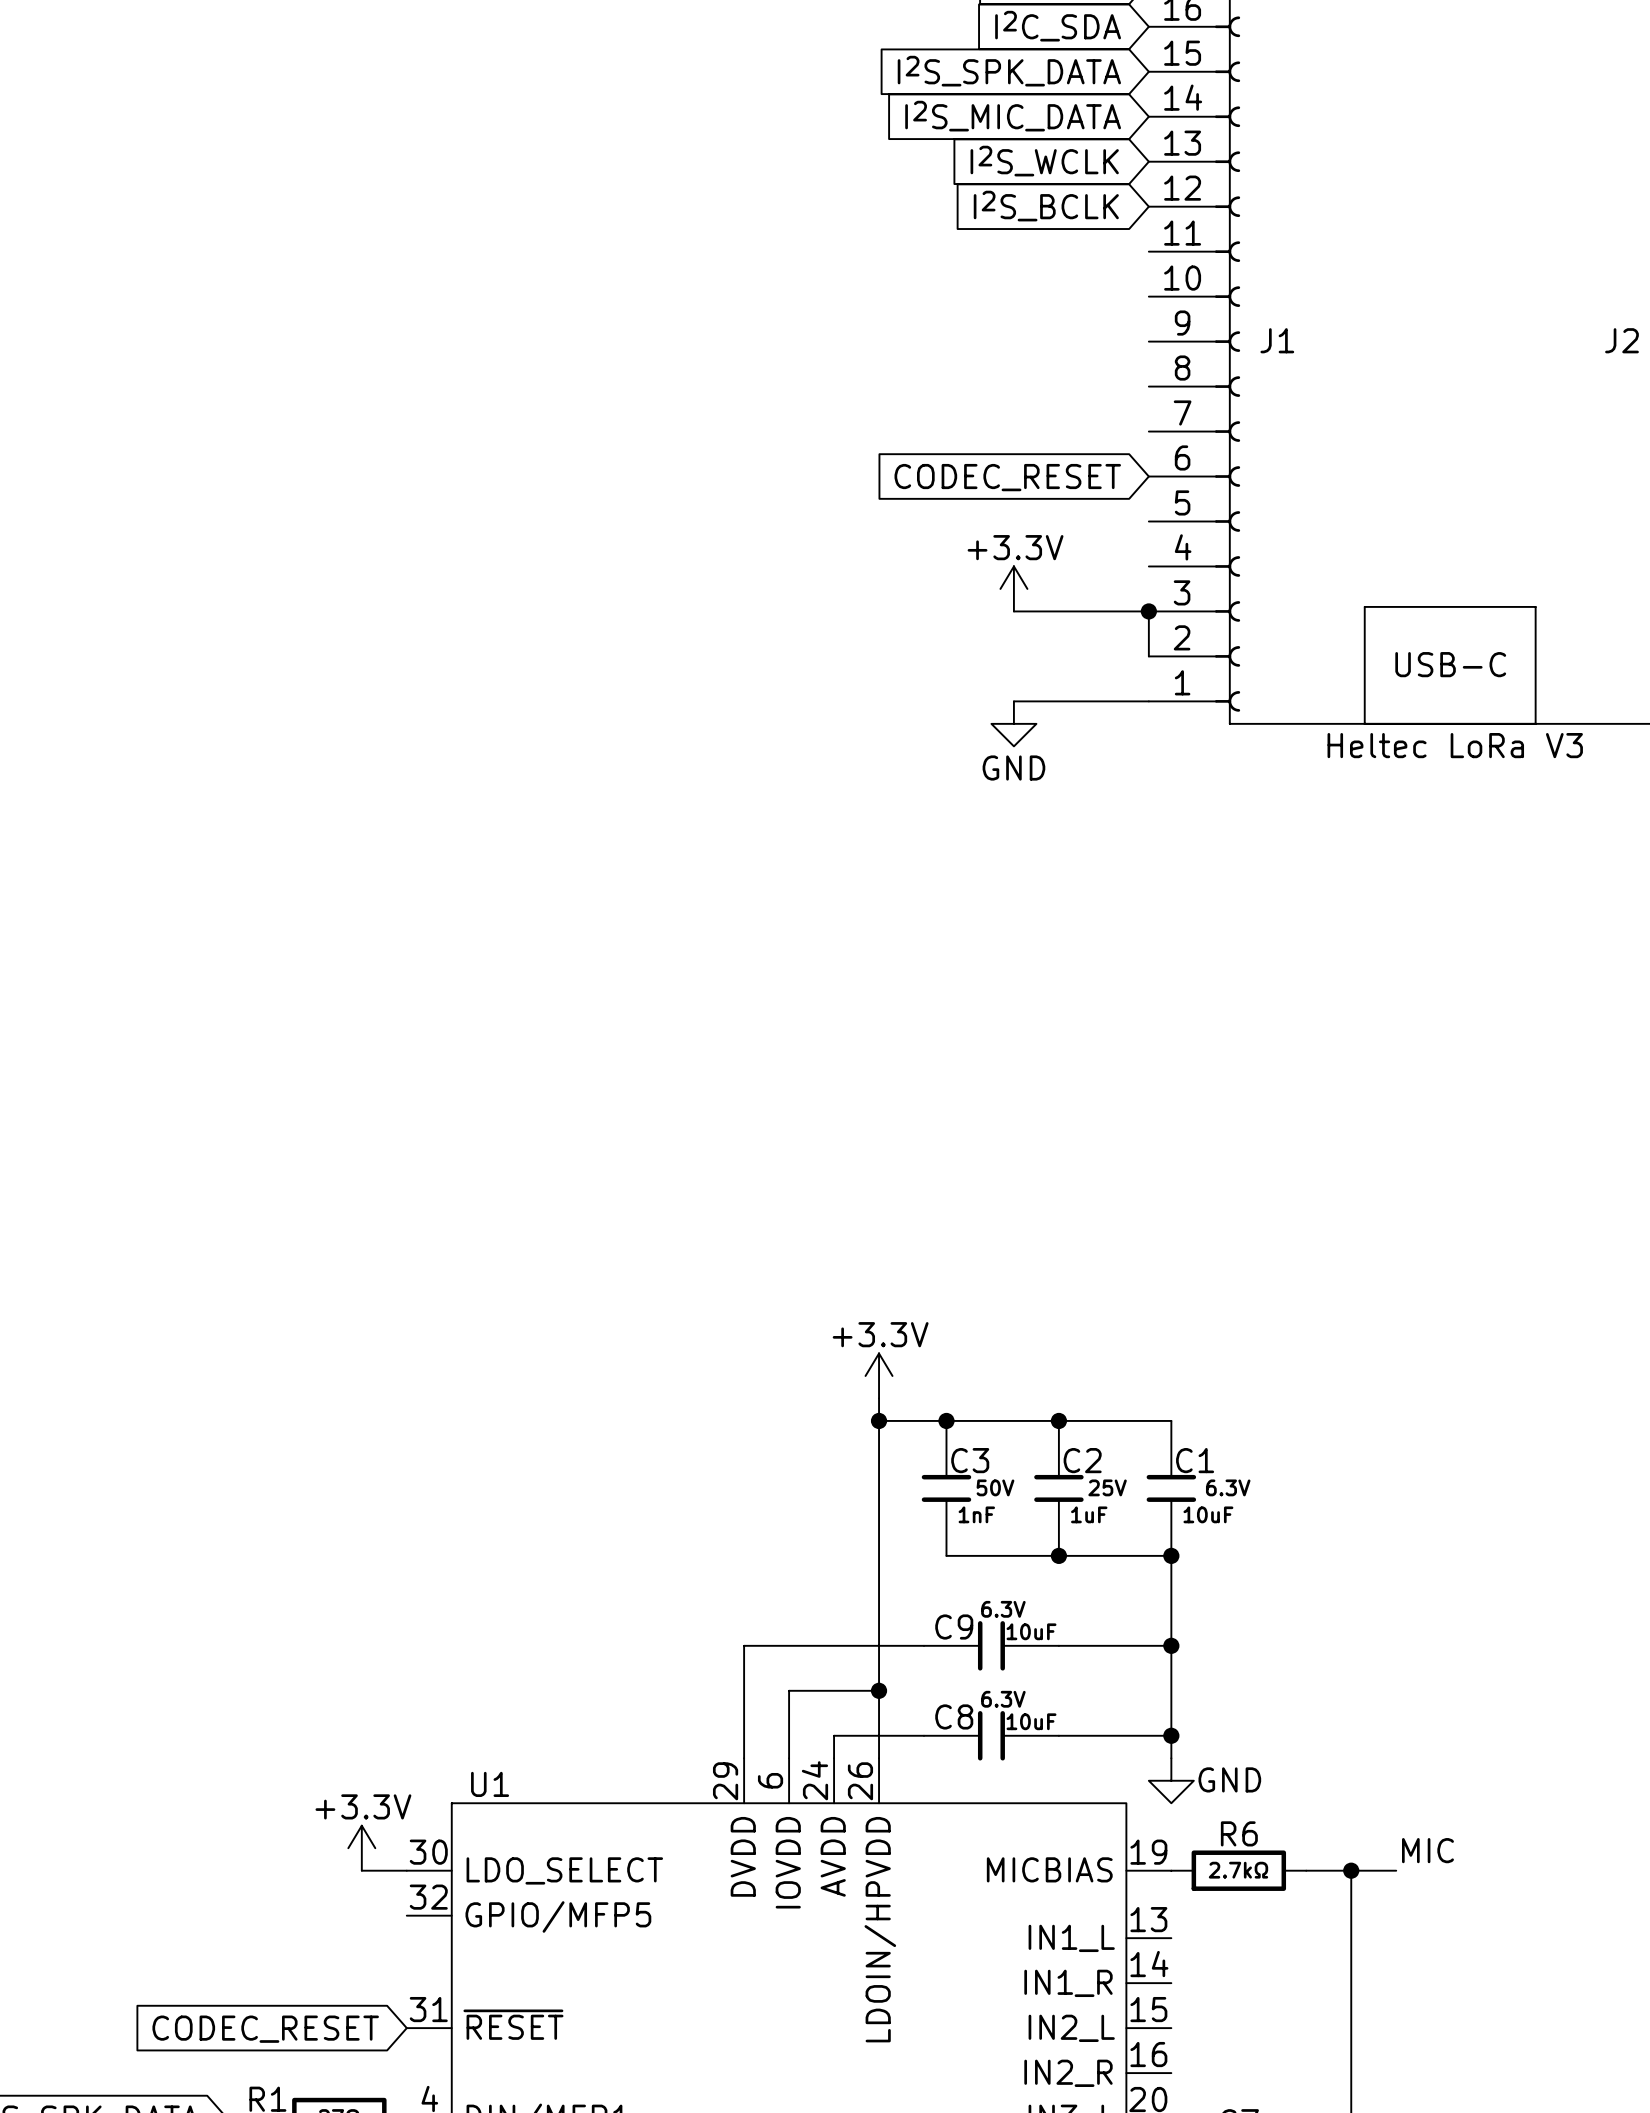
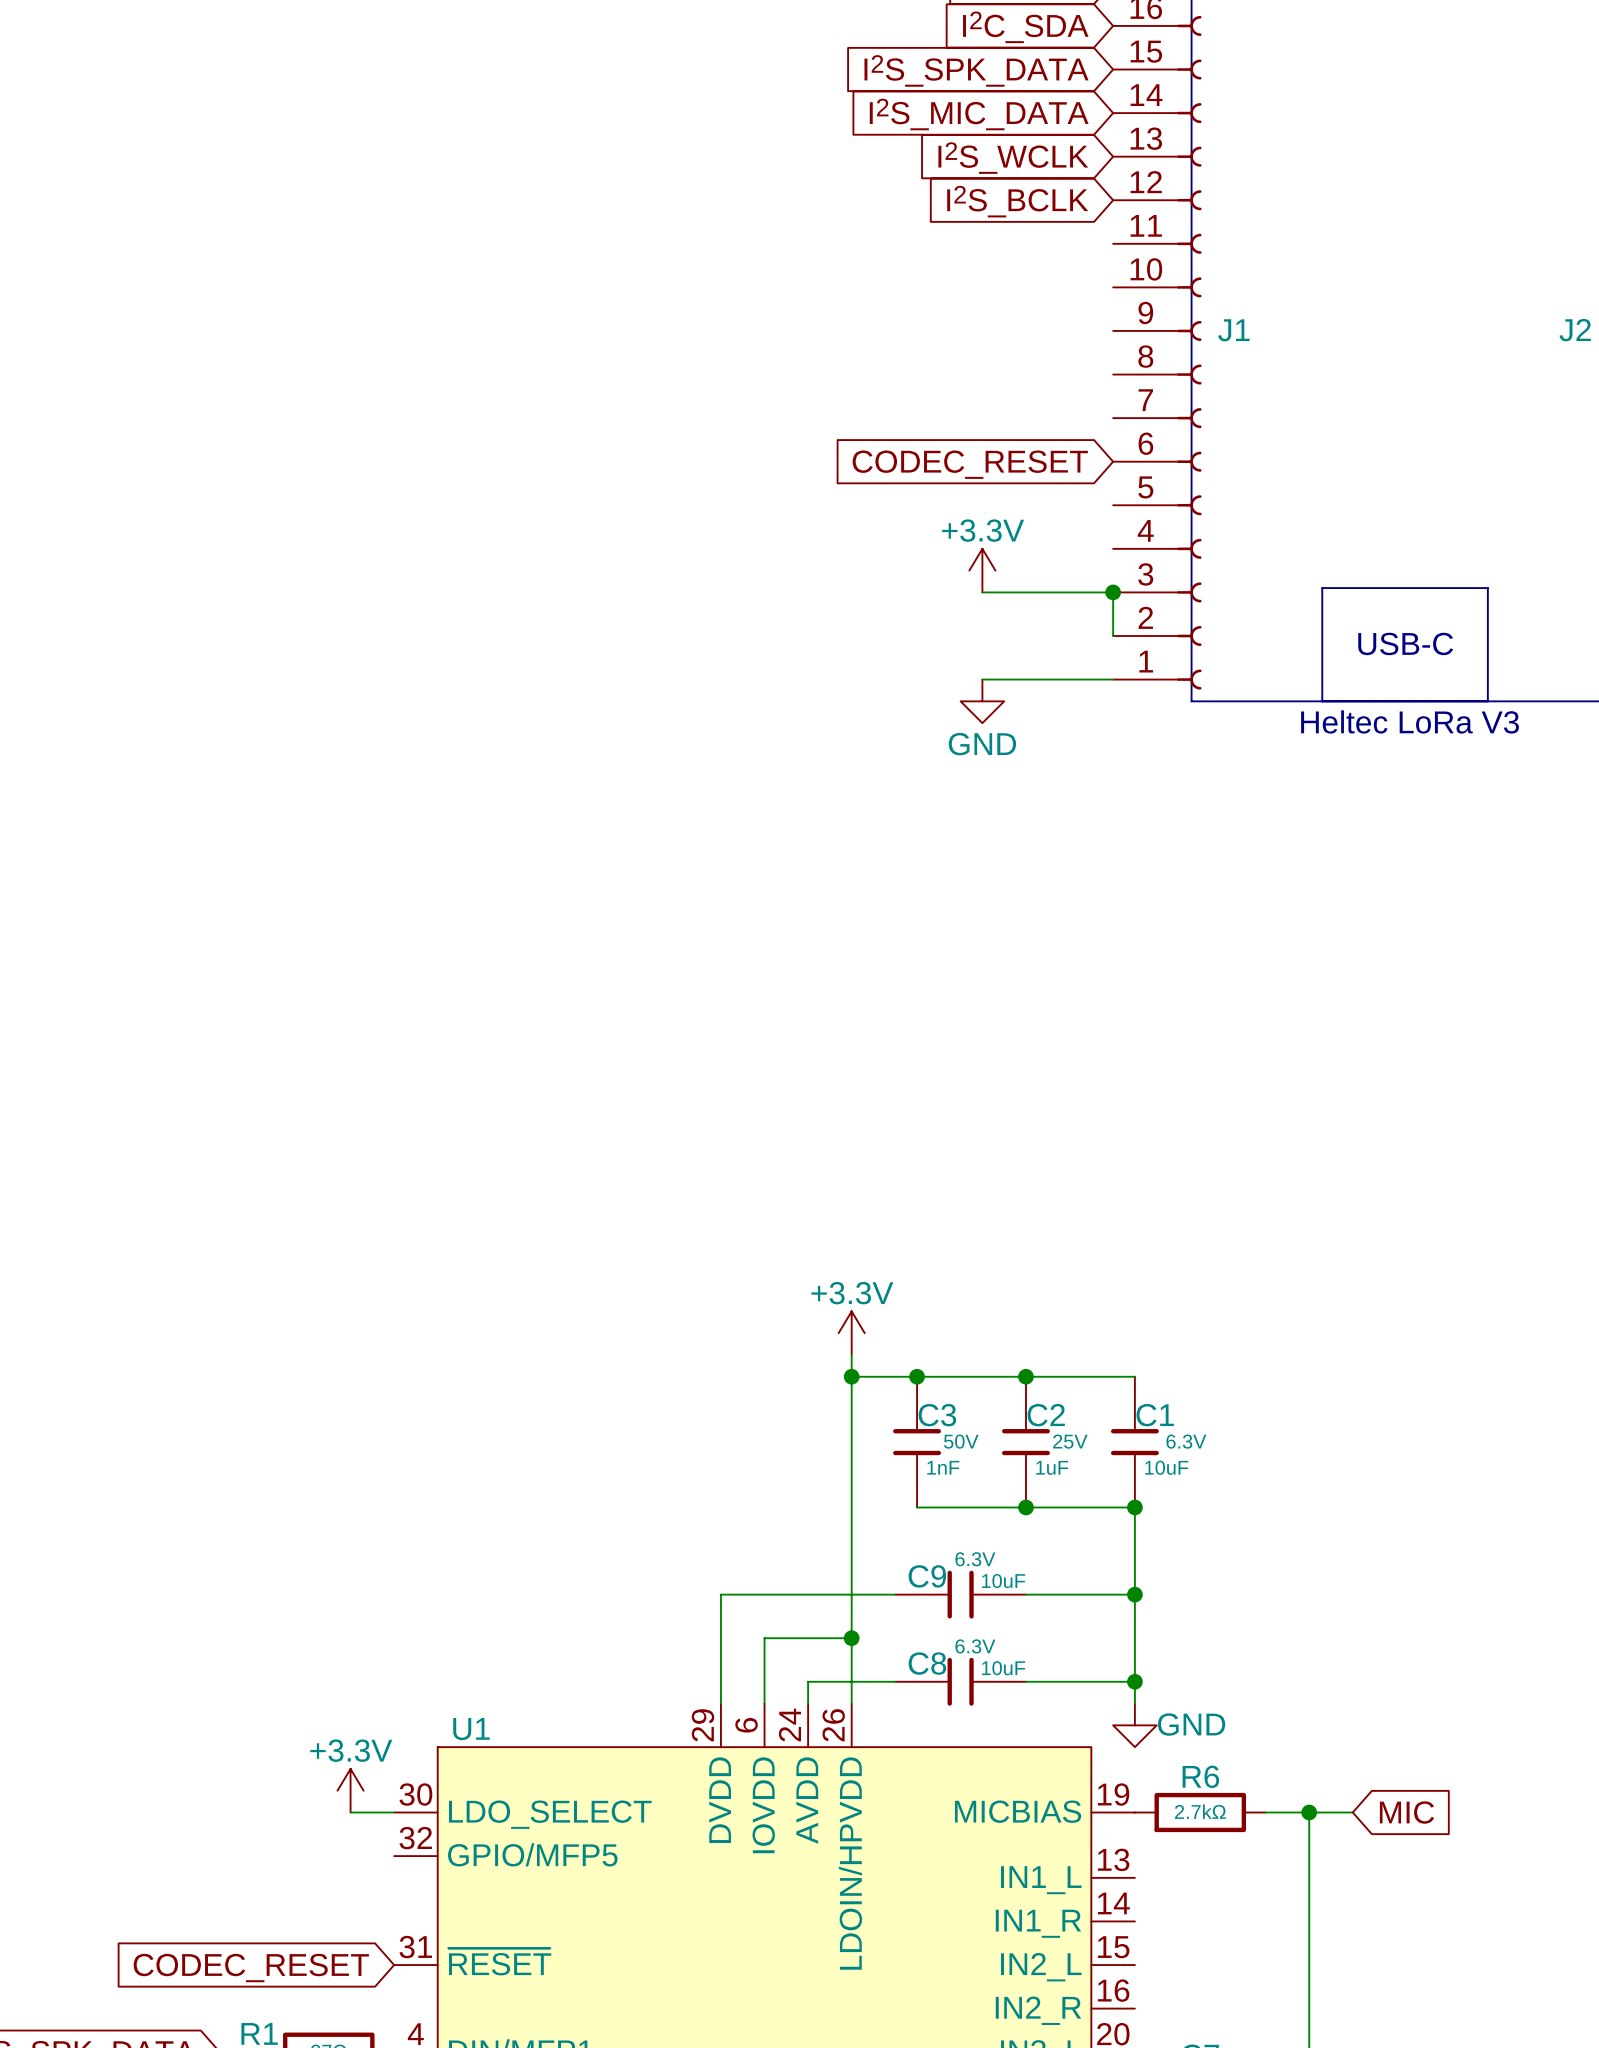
label: MIC (1427, 1850) -> none
global label: none -> MIC (1407, 1812)

